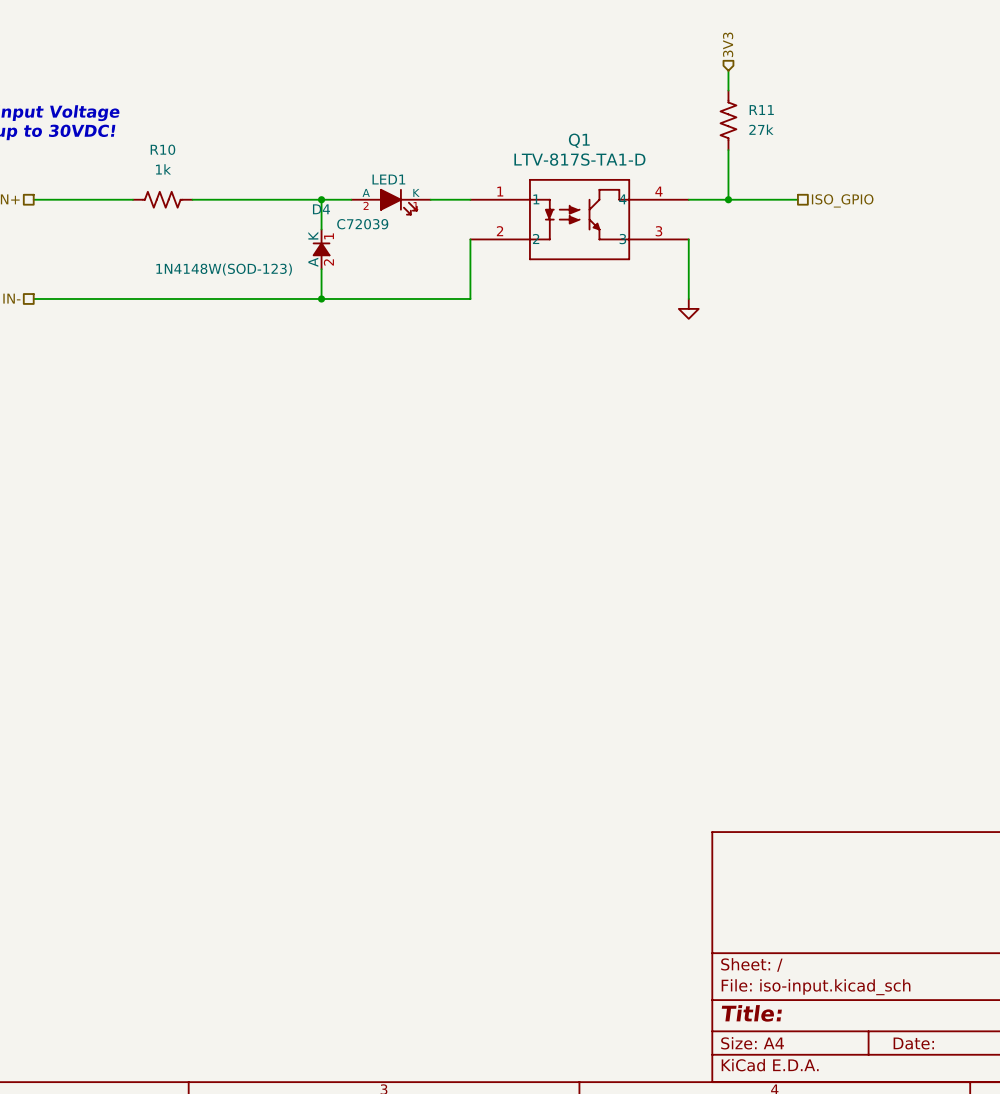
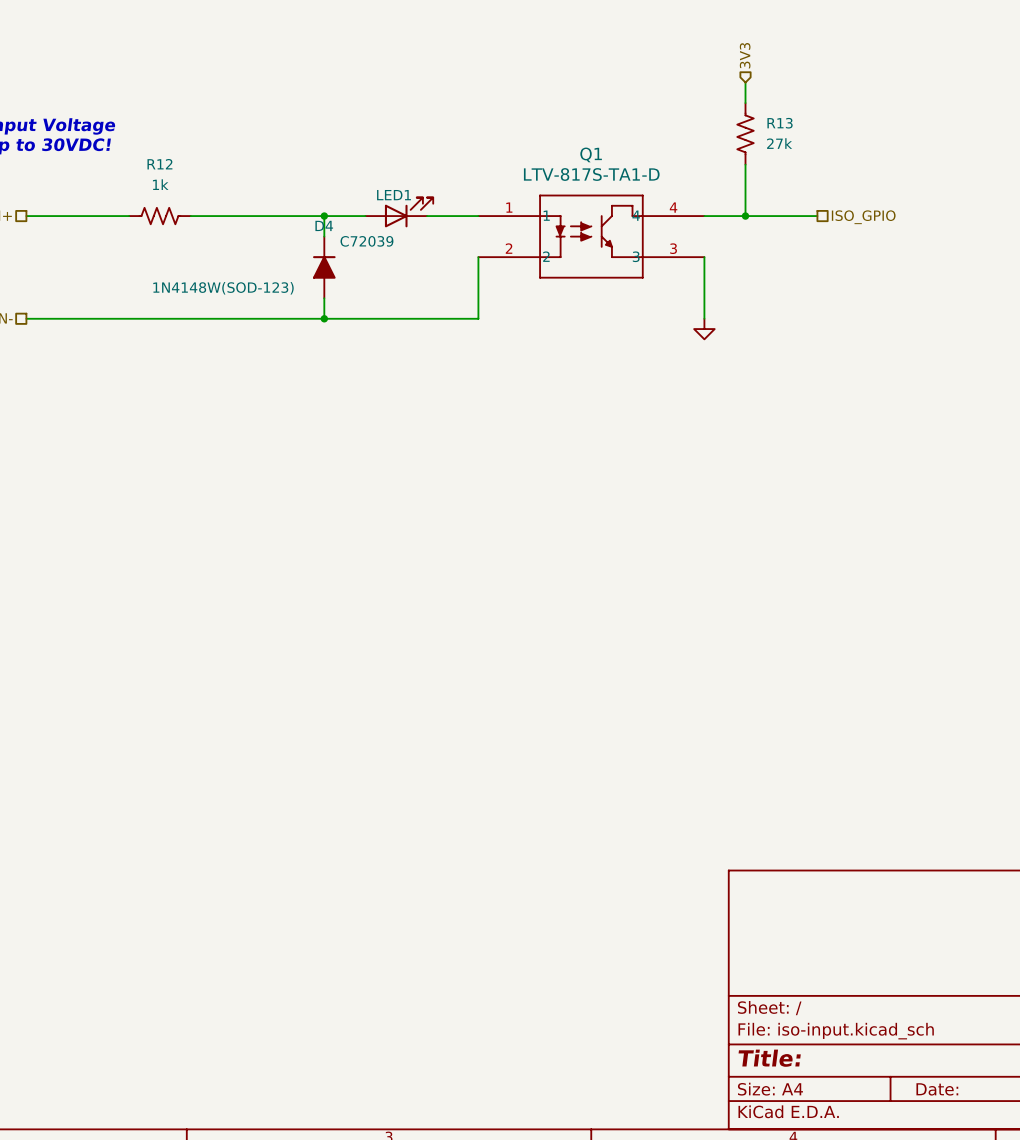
R11 name: R11 (761, 110) -> R13 (780, 123)
R10 name: R10 (162, 149) -> R12 (159, 164)
LED1 symbol: [351, 189, 431, 215] -> [365, 197, 434, 228]
D4 symbol: [313, 229, 330, 270] -> [313, 236, 336, 299]

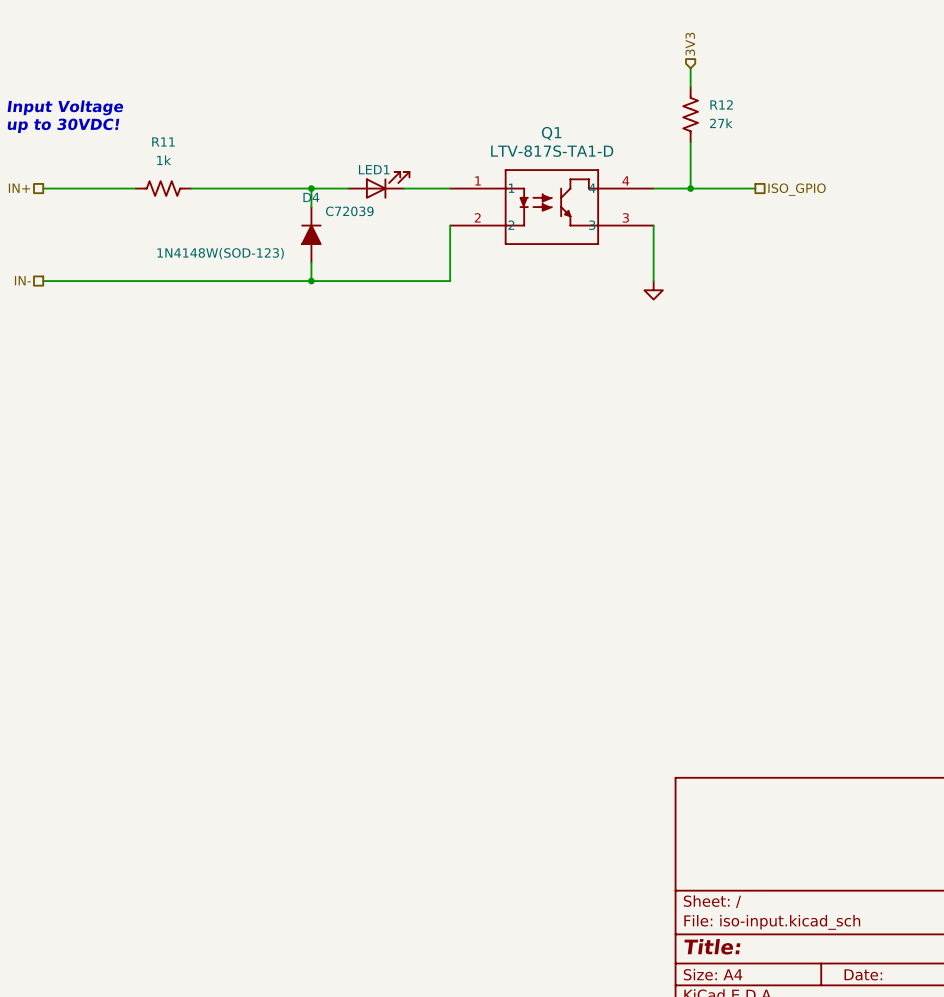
R13 name: R13 (780, 123) -> R12 (721, 104)
R12 name: R12 (159, 164) -> R11 (163, 141)

